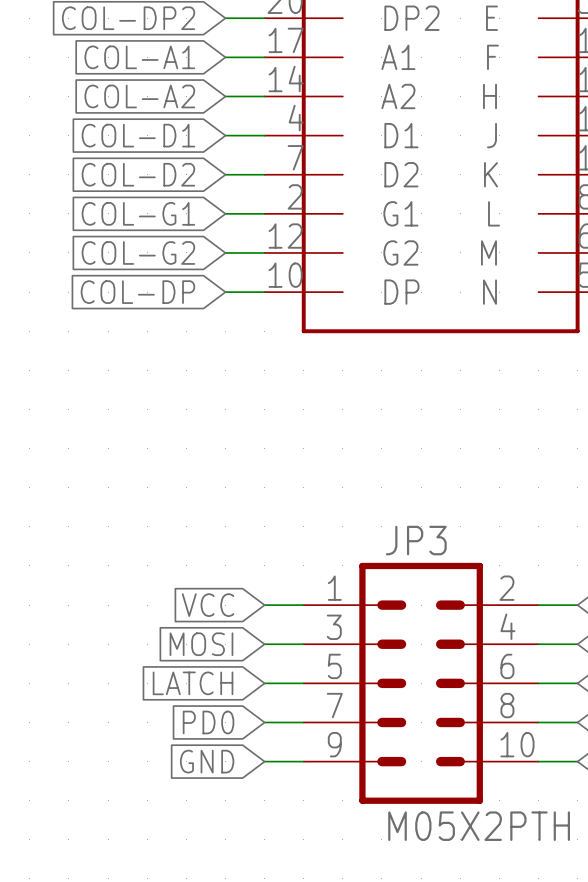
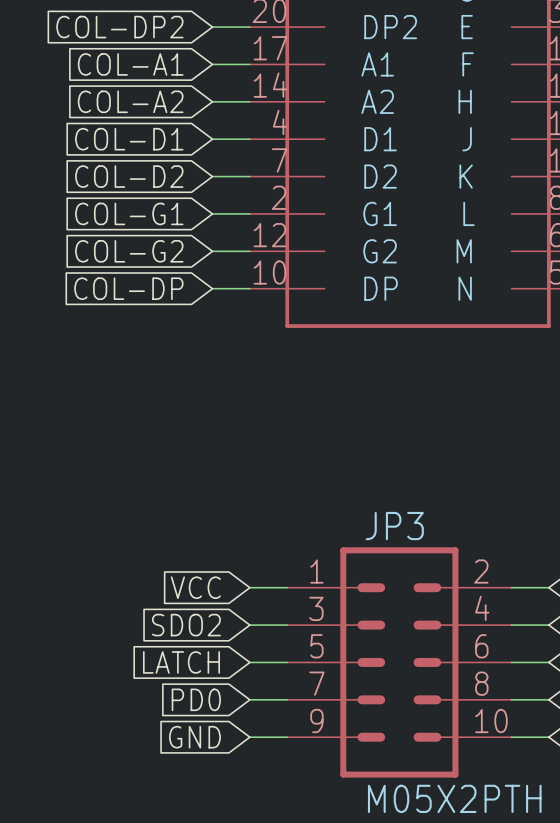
global label: MOSI (201, 644) -> SDO2 (186, 625)

